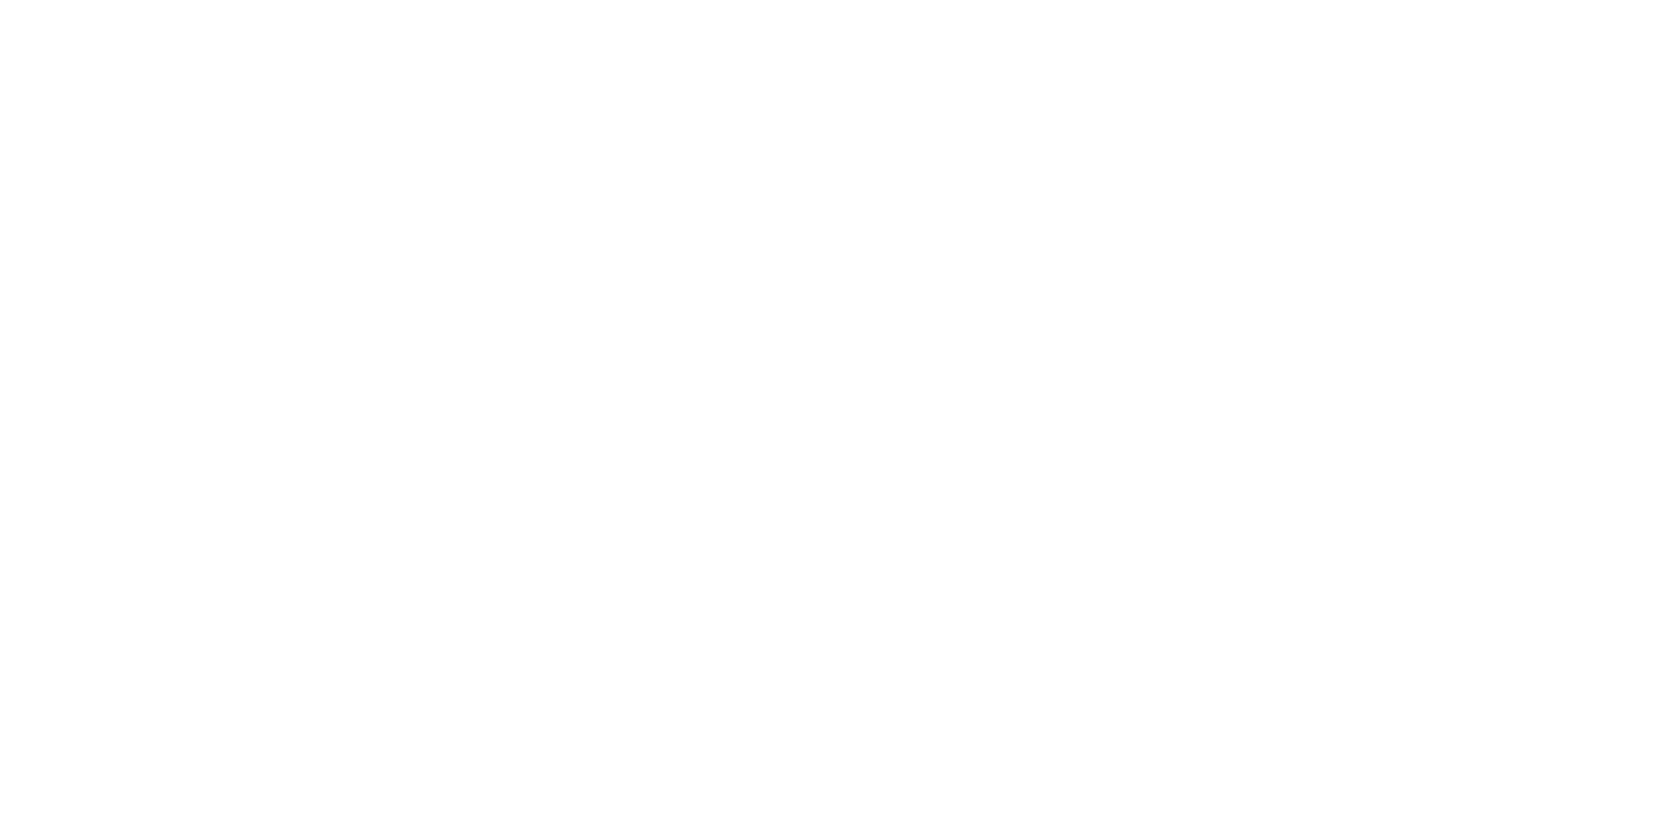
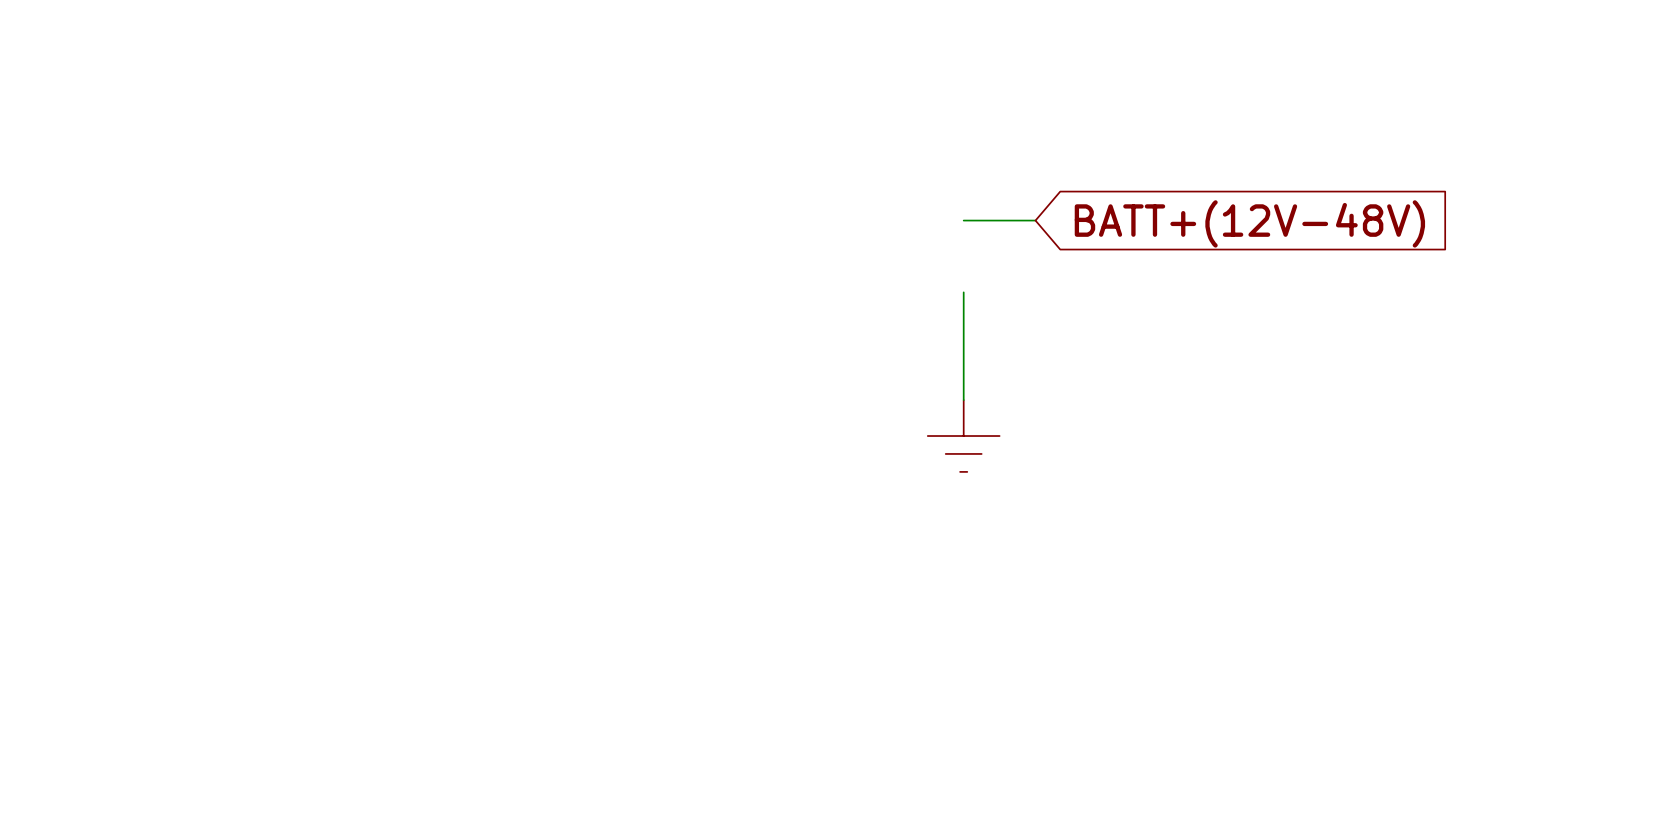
wire: none -> (963, 220) (1035, 220)
global label: none -> BATT+(12V-48V) (1249, 223)
wire: none -> (963, 292) (963, 400)
power symbol: none -> (963, 436)

